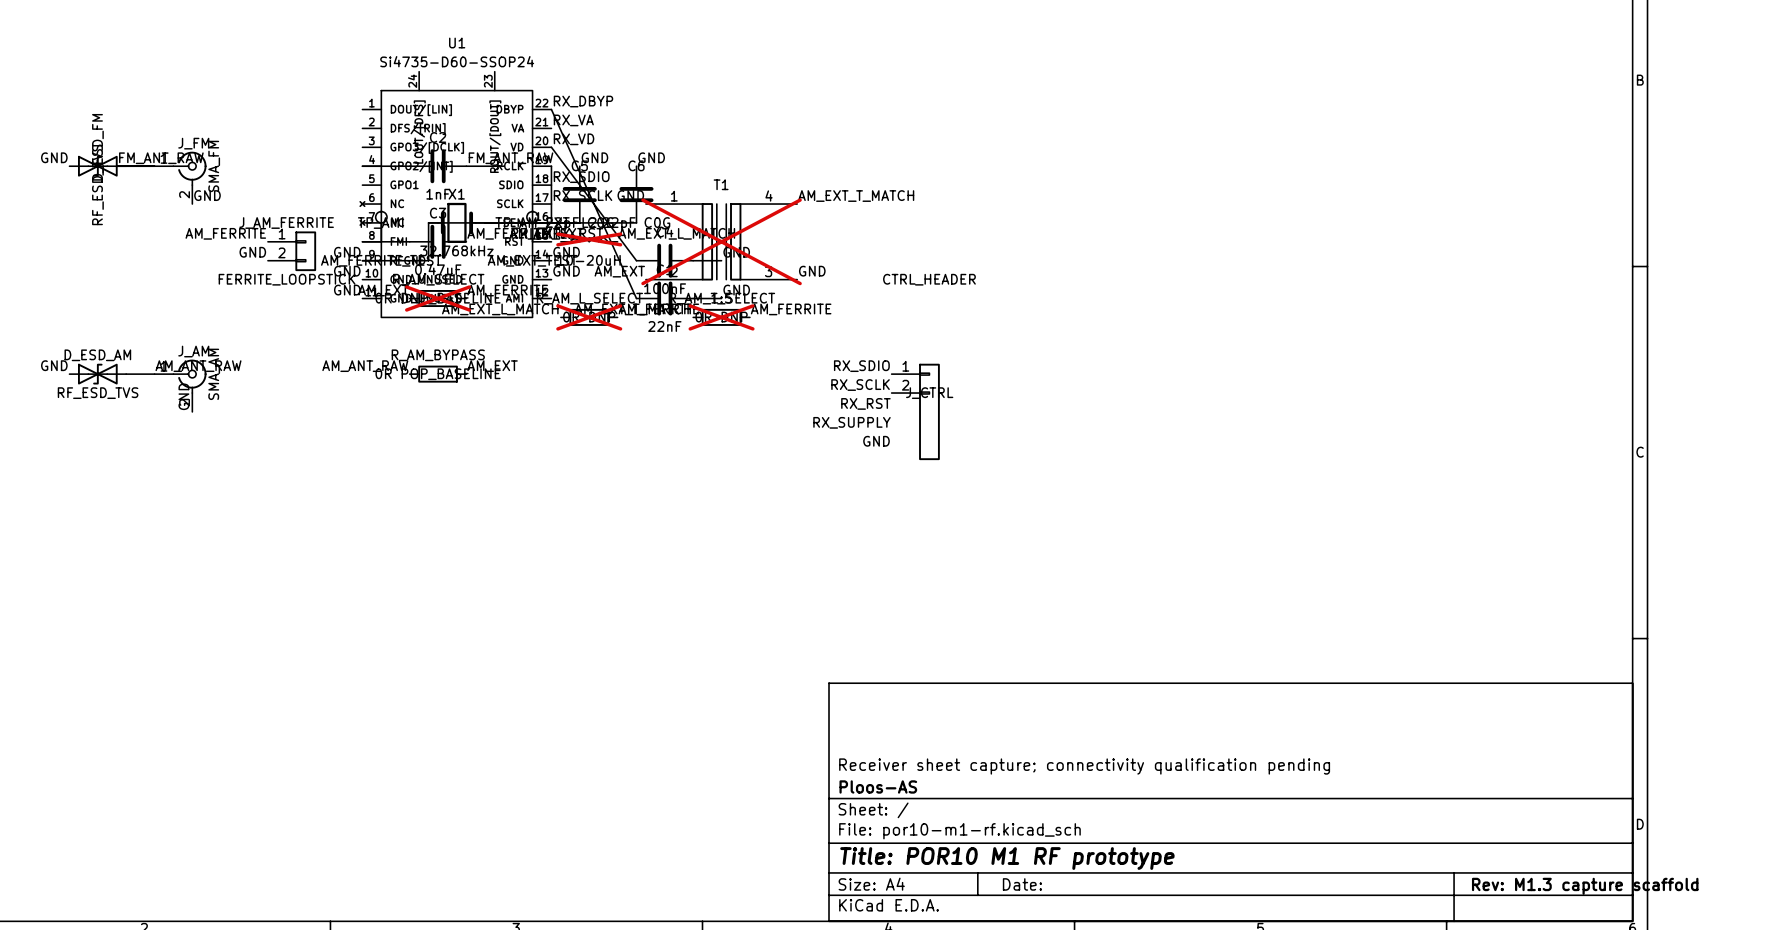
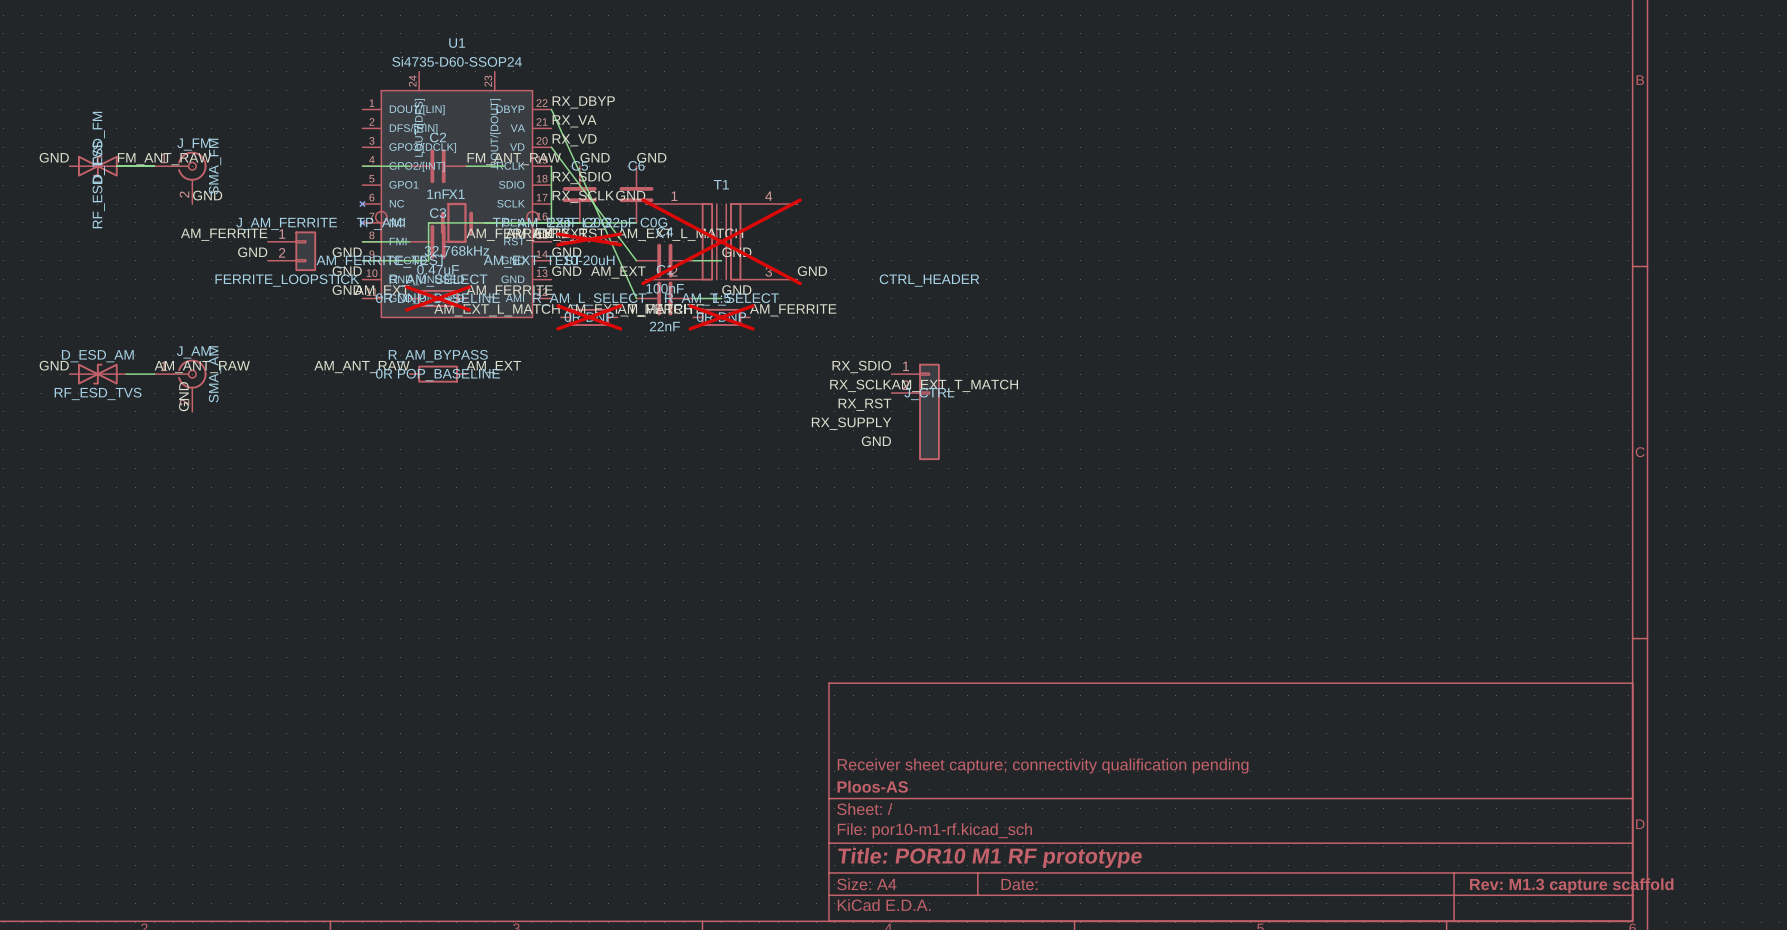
label: AM_EXT_T_MATCH (856, 196) -> none
label: none -> AM_EXT_T_MATCH (954, 385)

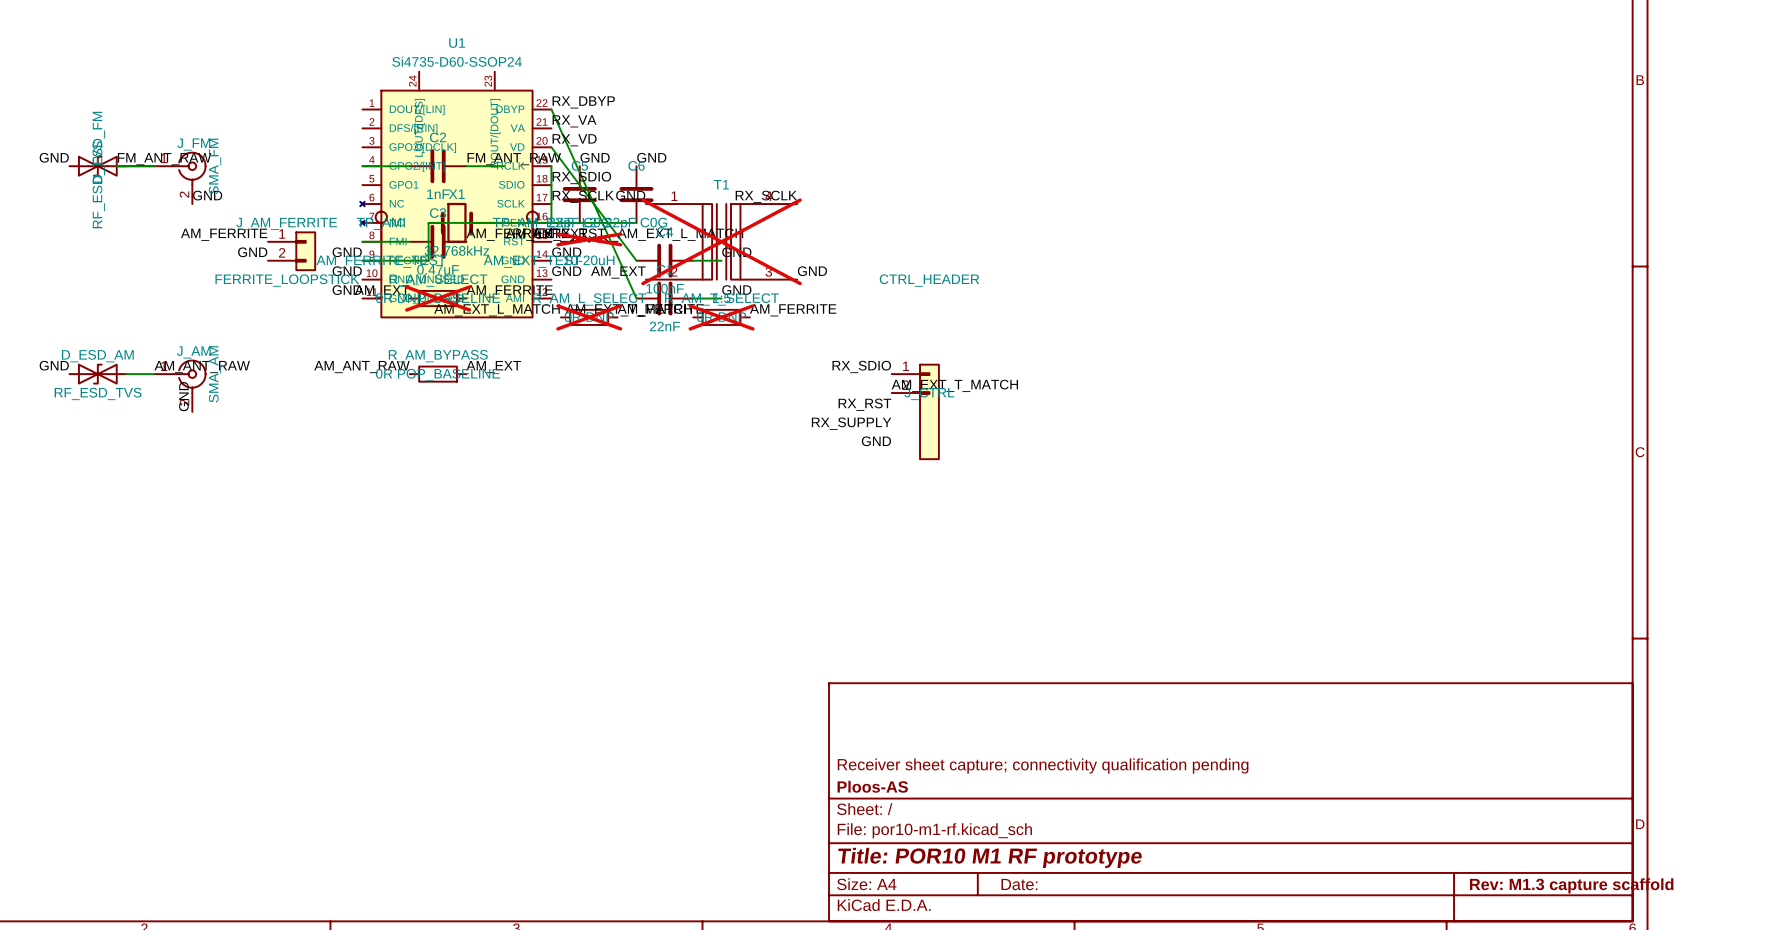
label: none -> RX_SCLK (766, 196)
label: RX_SCLK (860, 385) -> none

